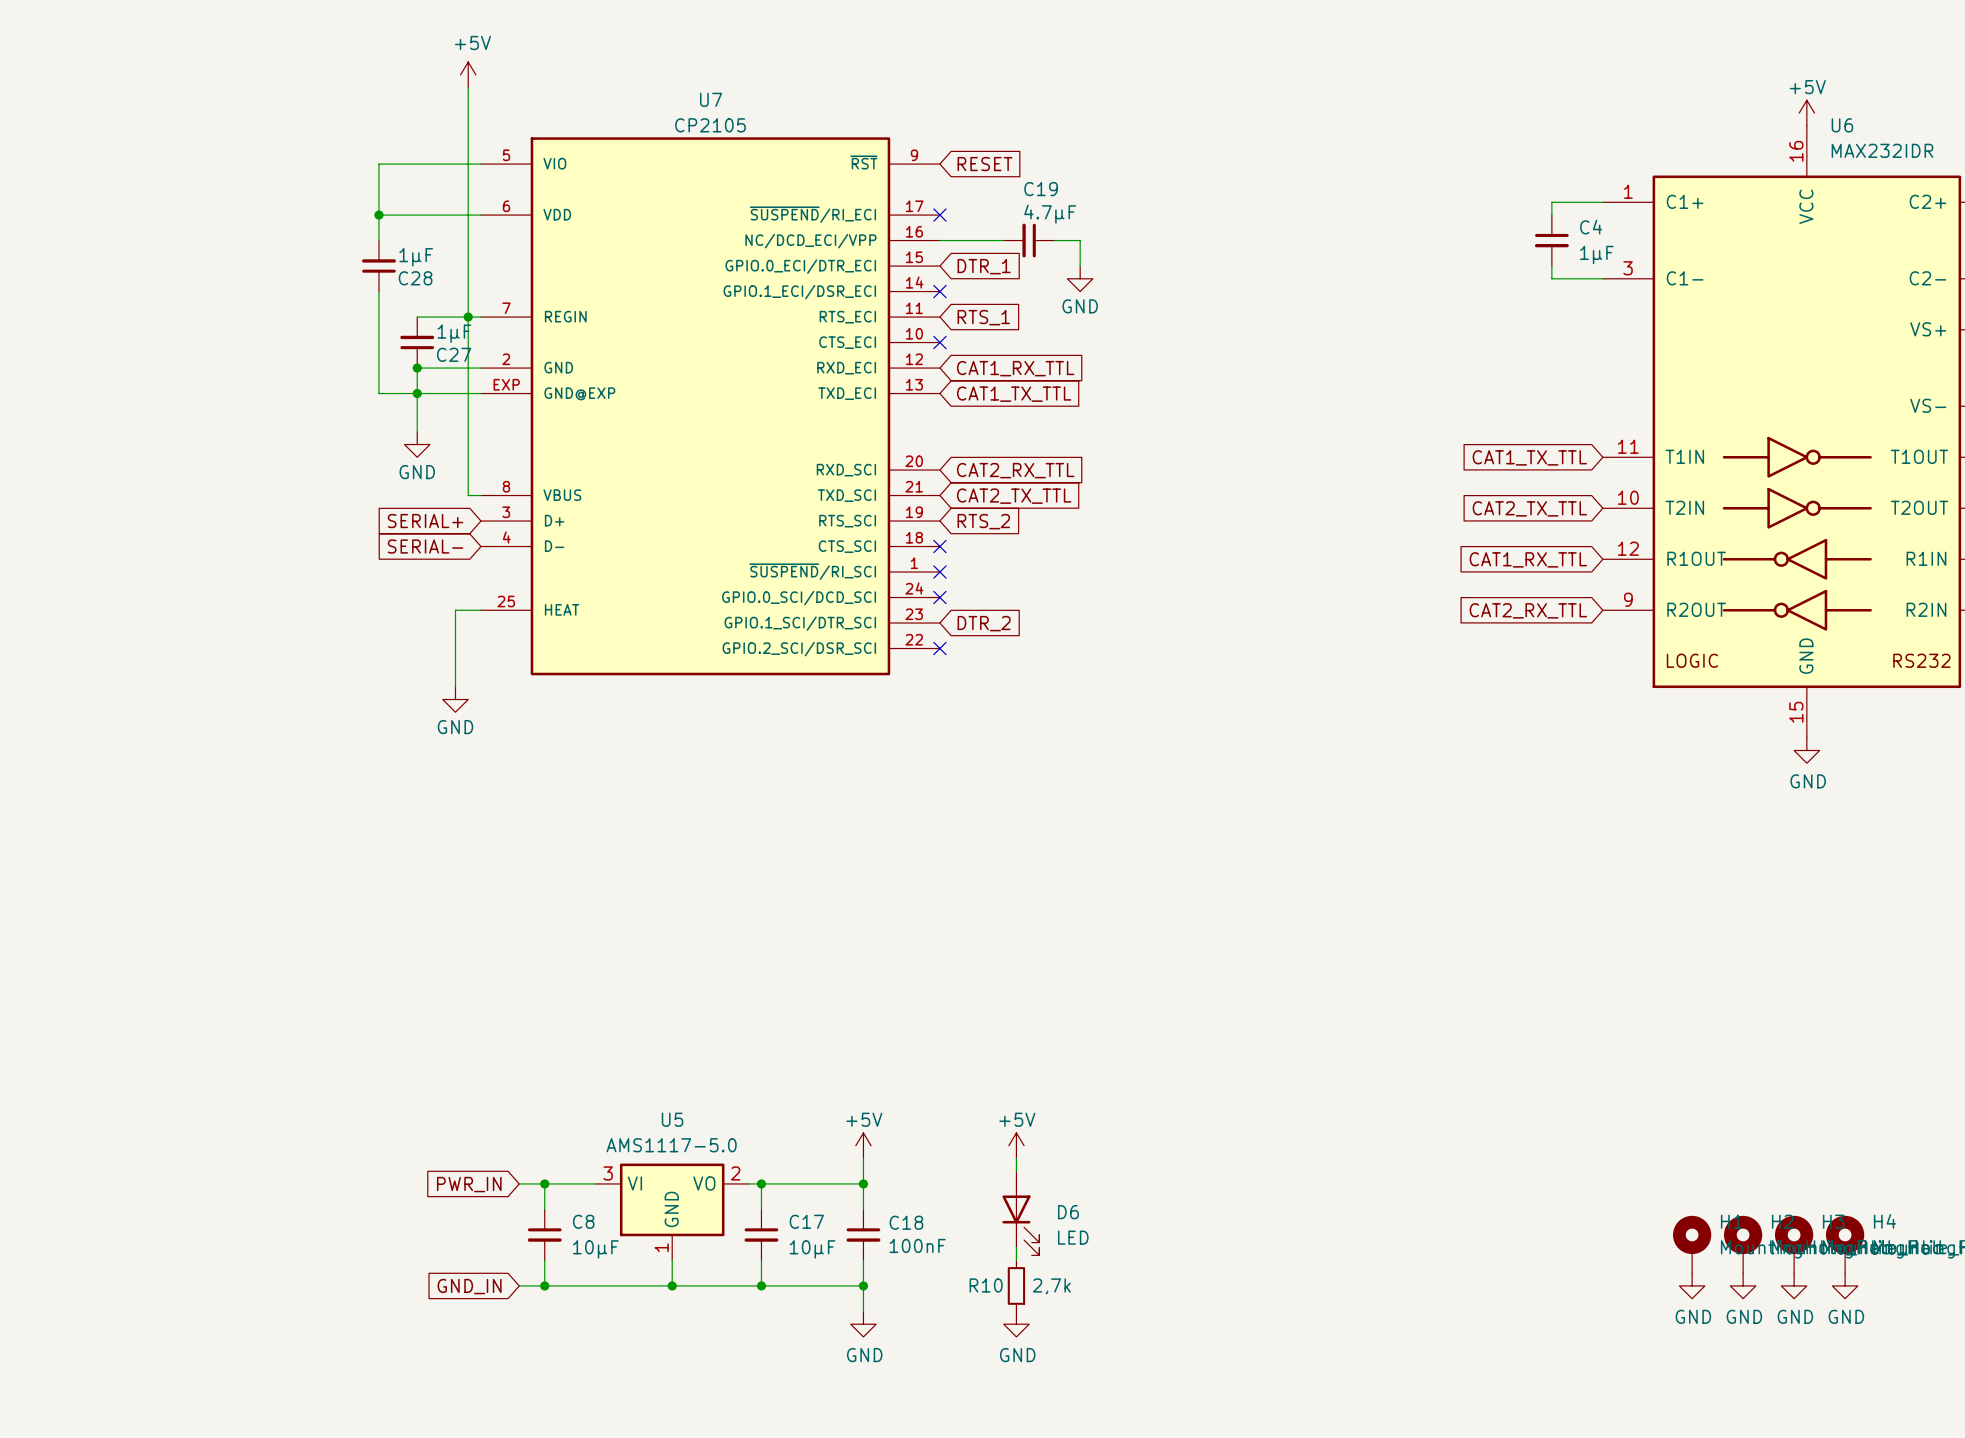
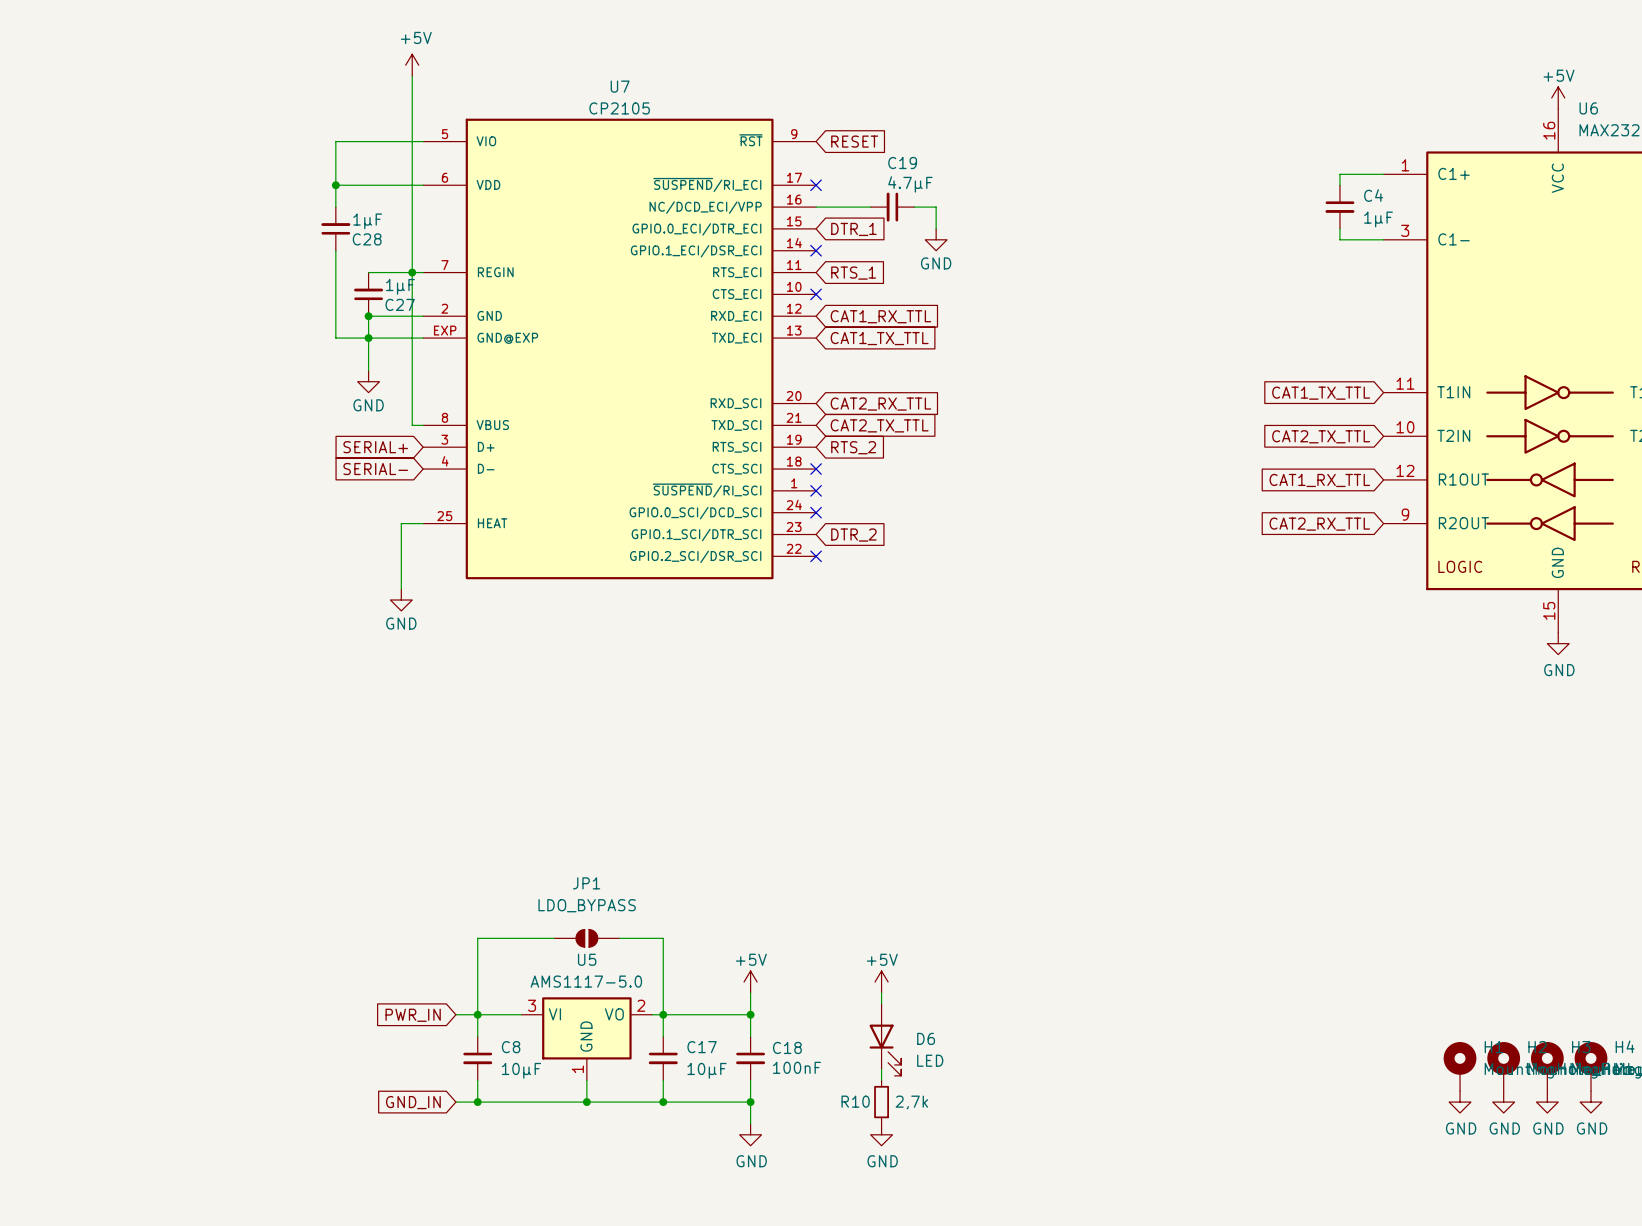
wire: none -> (554, 938) (477, 938) (477, 1014)
JP1: none -> LDO_BYPASS (586, 938)
wire: none -> (619, 938) (663, 938) (663, 1014)

